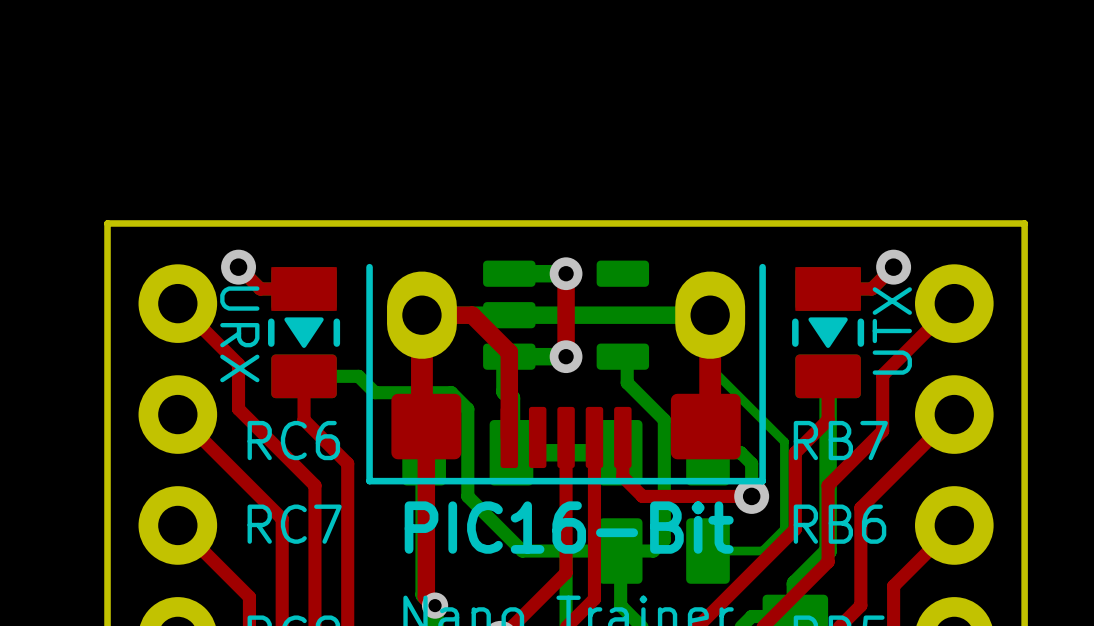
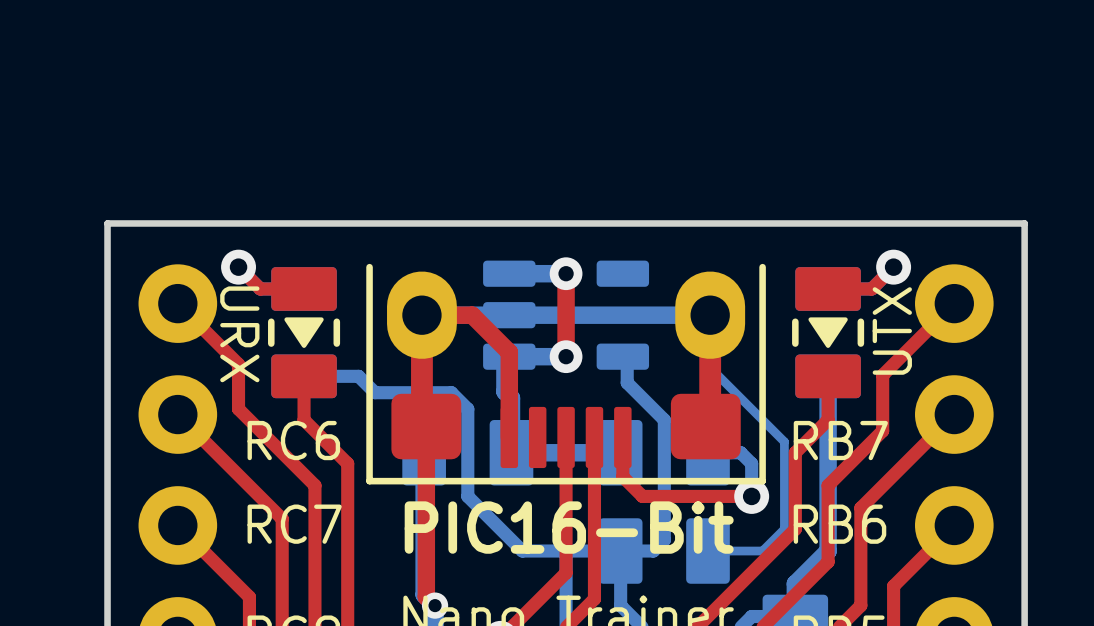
part footprint: [366, 263, 766, 485] -> [366, 263, 766, 485]
part footprint: [268, 267, 341, 399] -> [268, 267, 341, 399]
part footprint: [792, 267, 865, 399] -> [792, 267, 865, 399]

